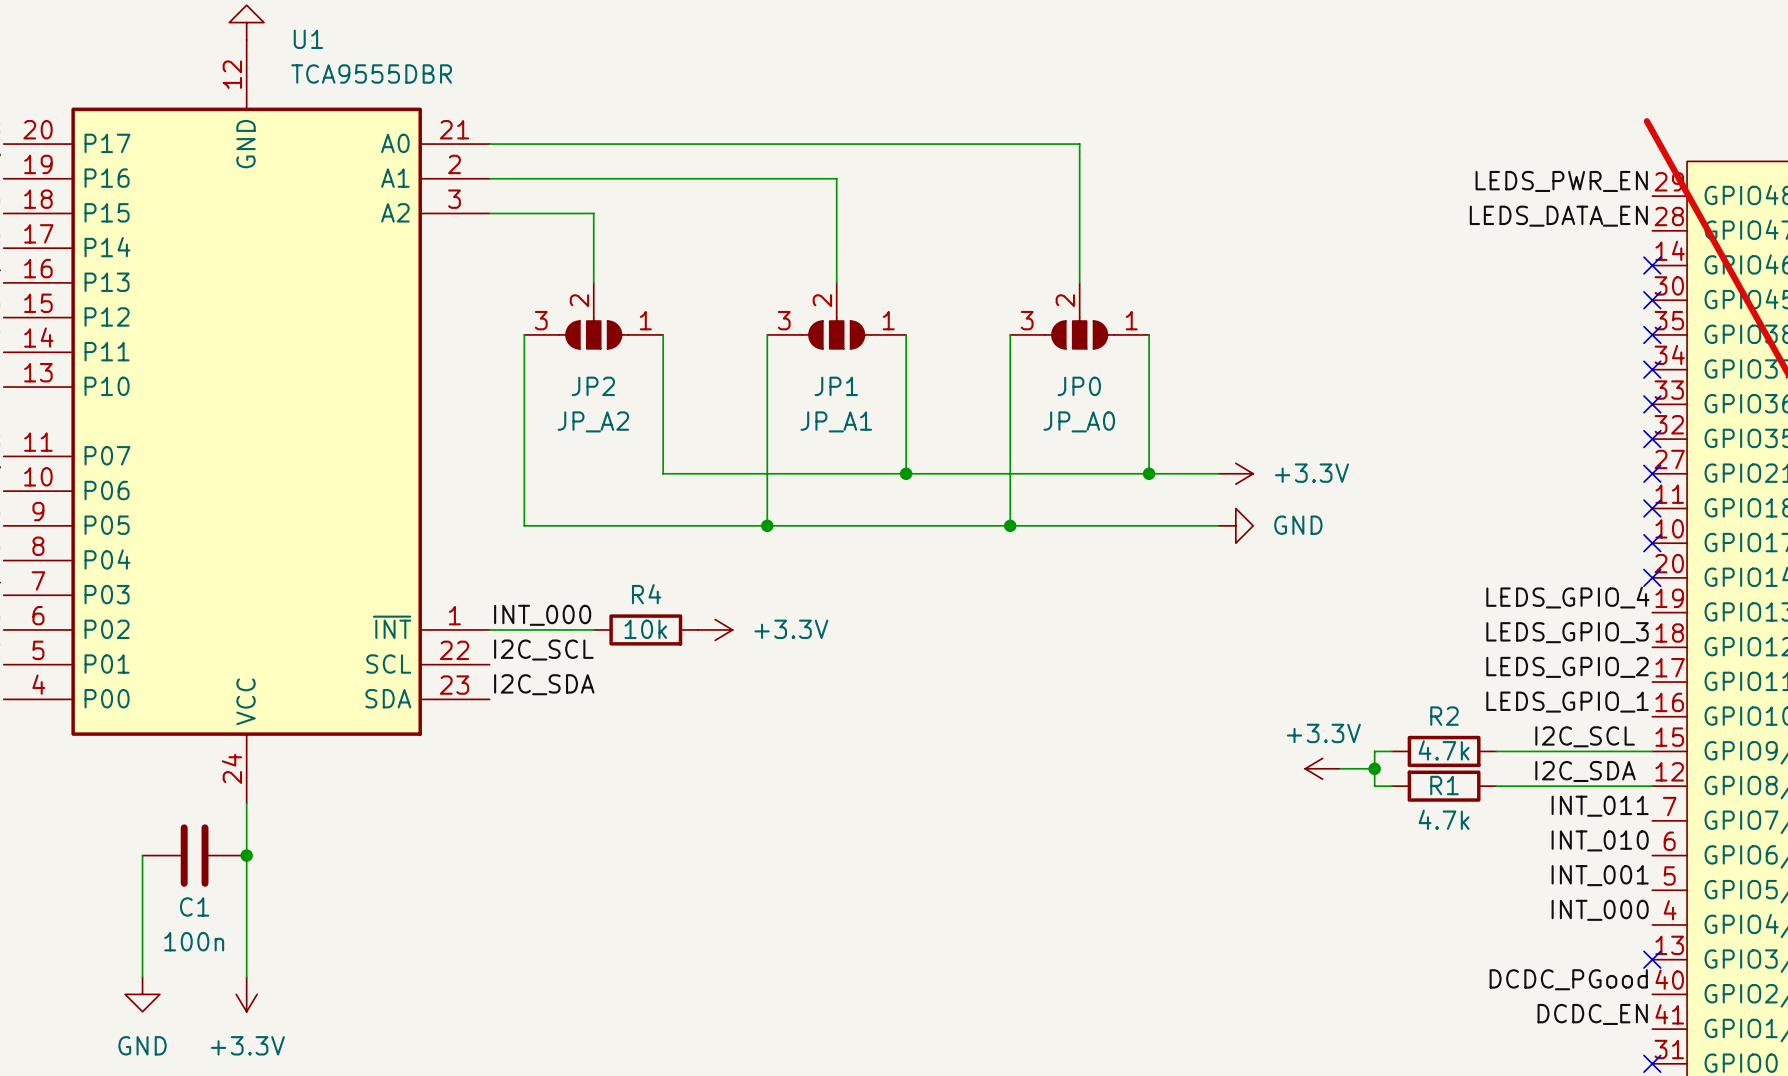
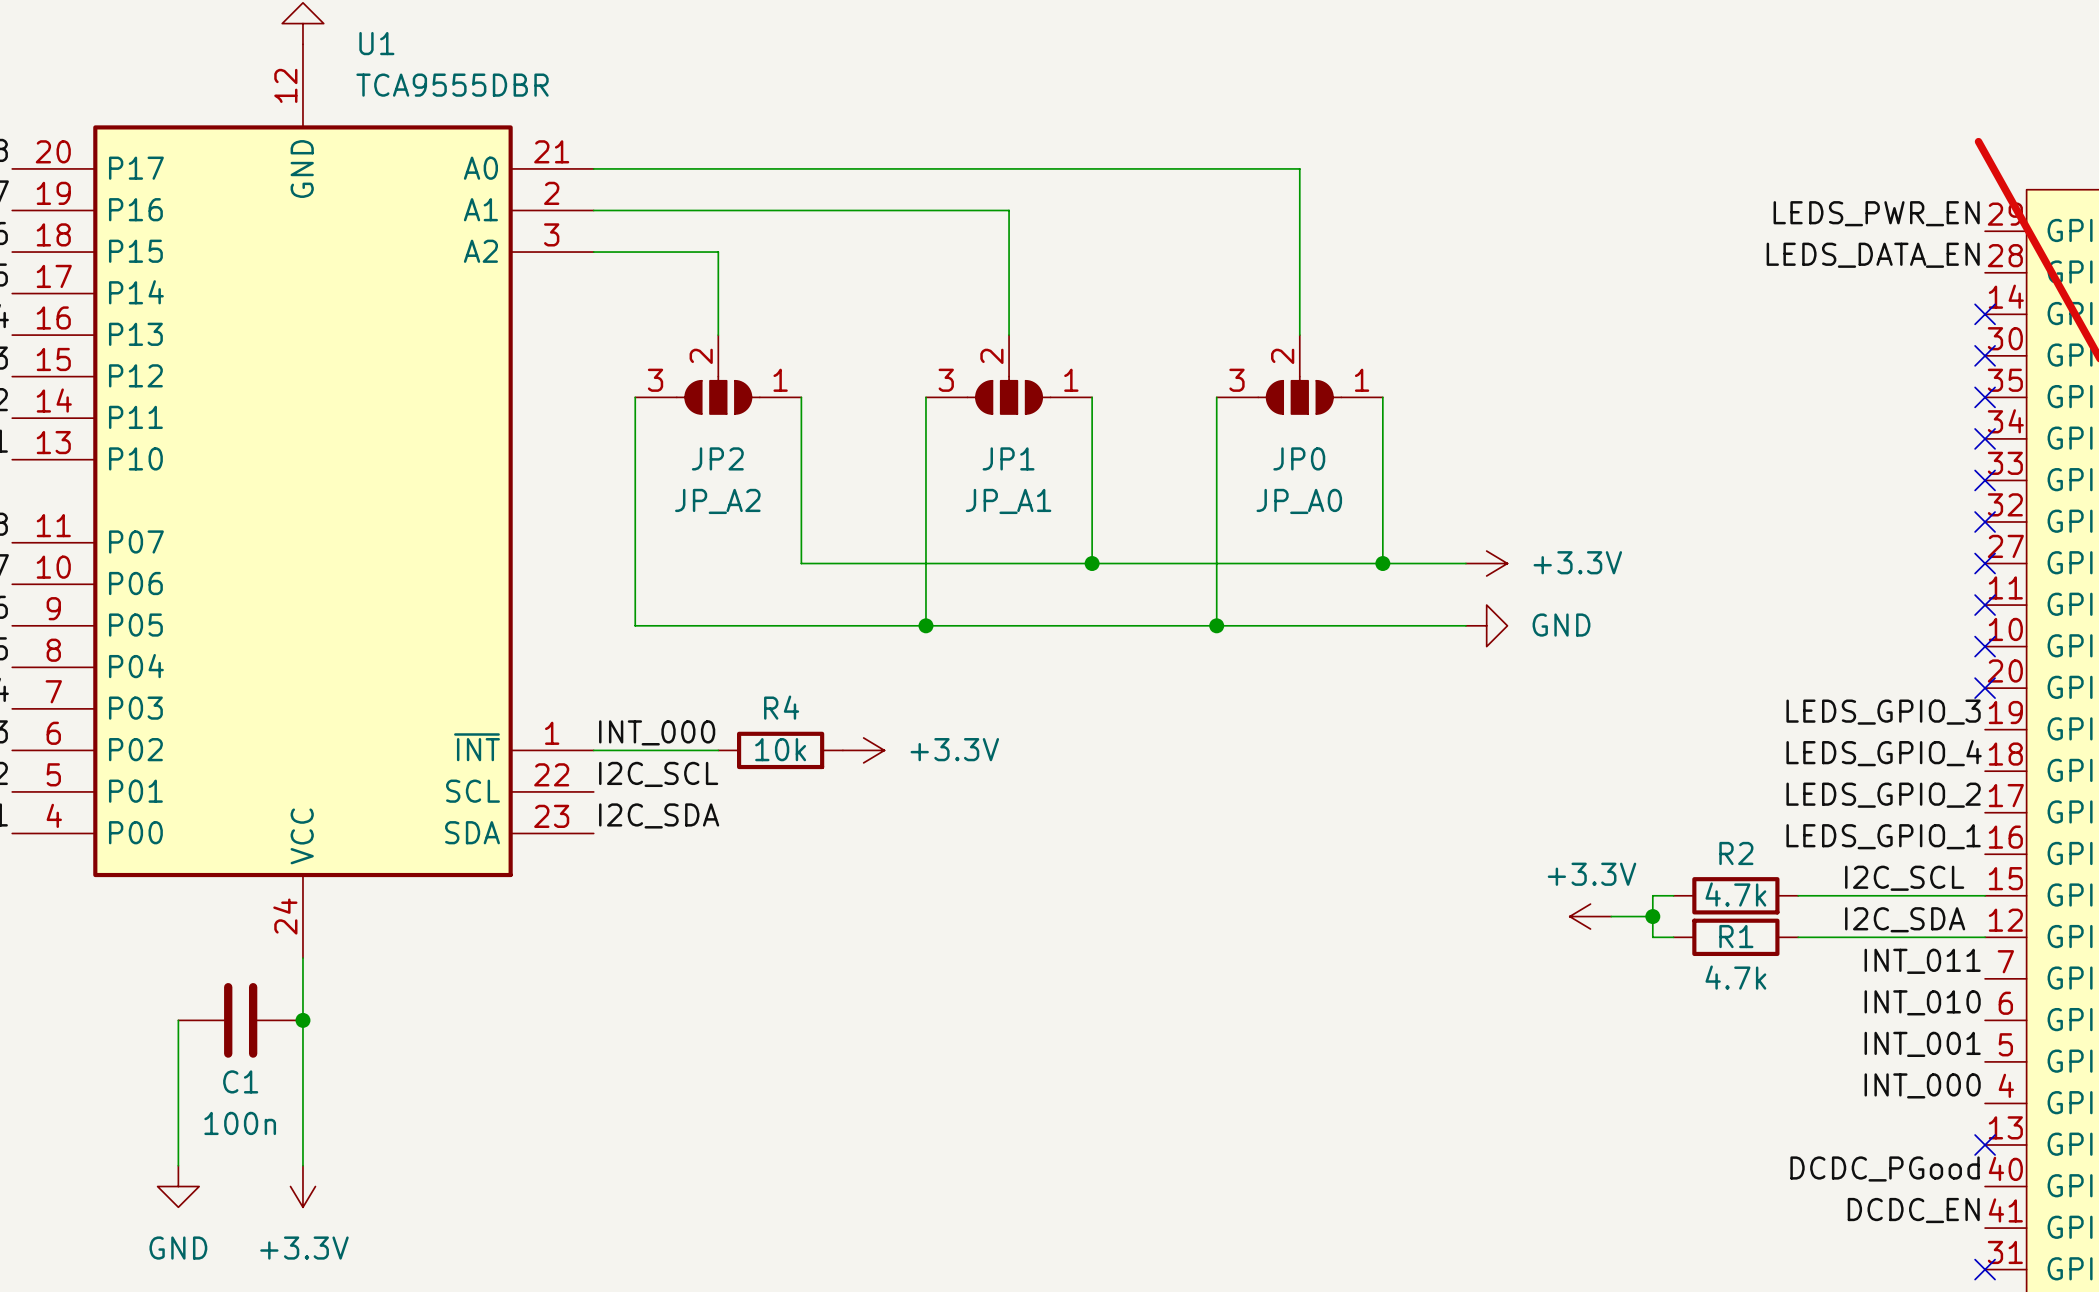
label: LEDS_GPIO_4 (1567, 597) -> LEDS_GPIO_3 (1883, 712)
label: LEDS_GPIO_3 (1567, 632) -> LEDS_GPIO_4 (1884, 753)

